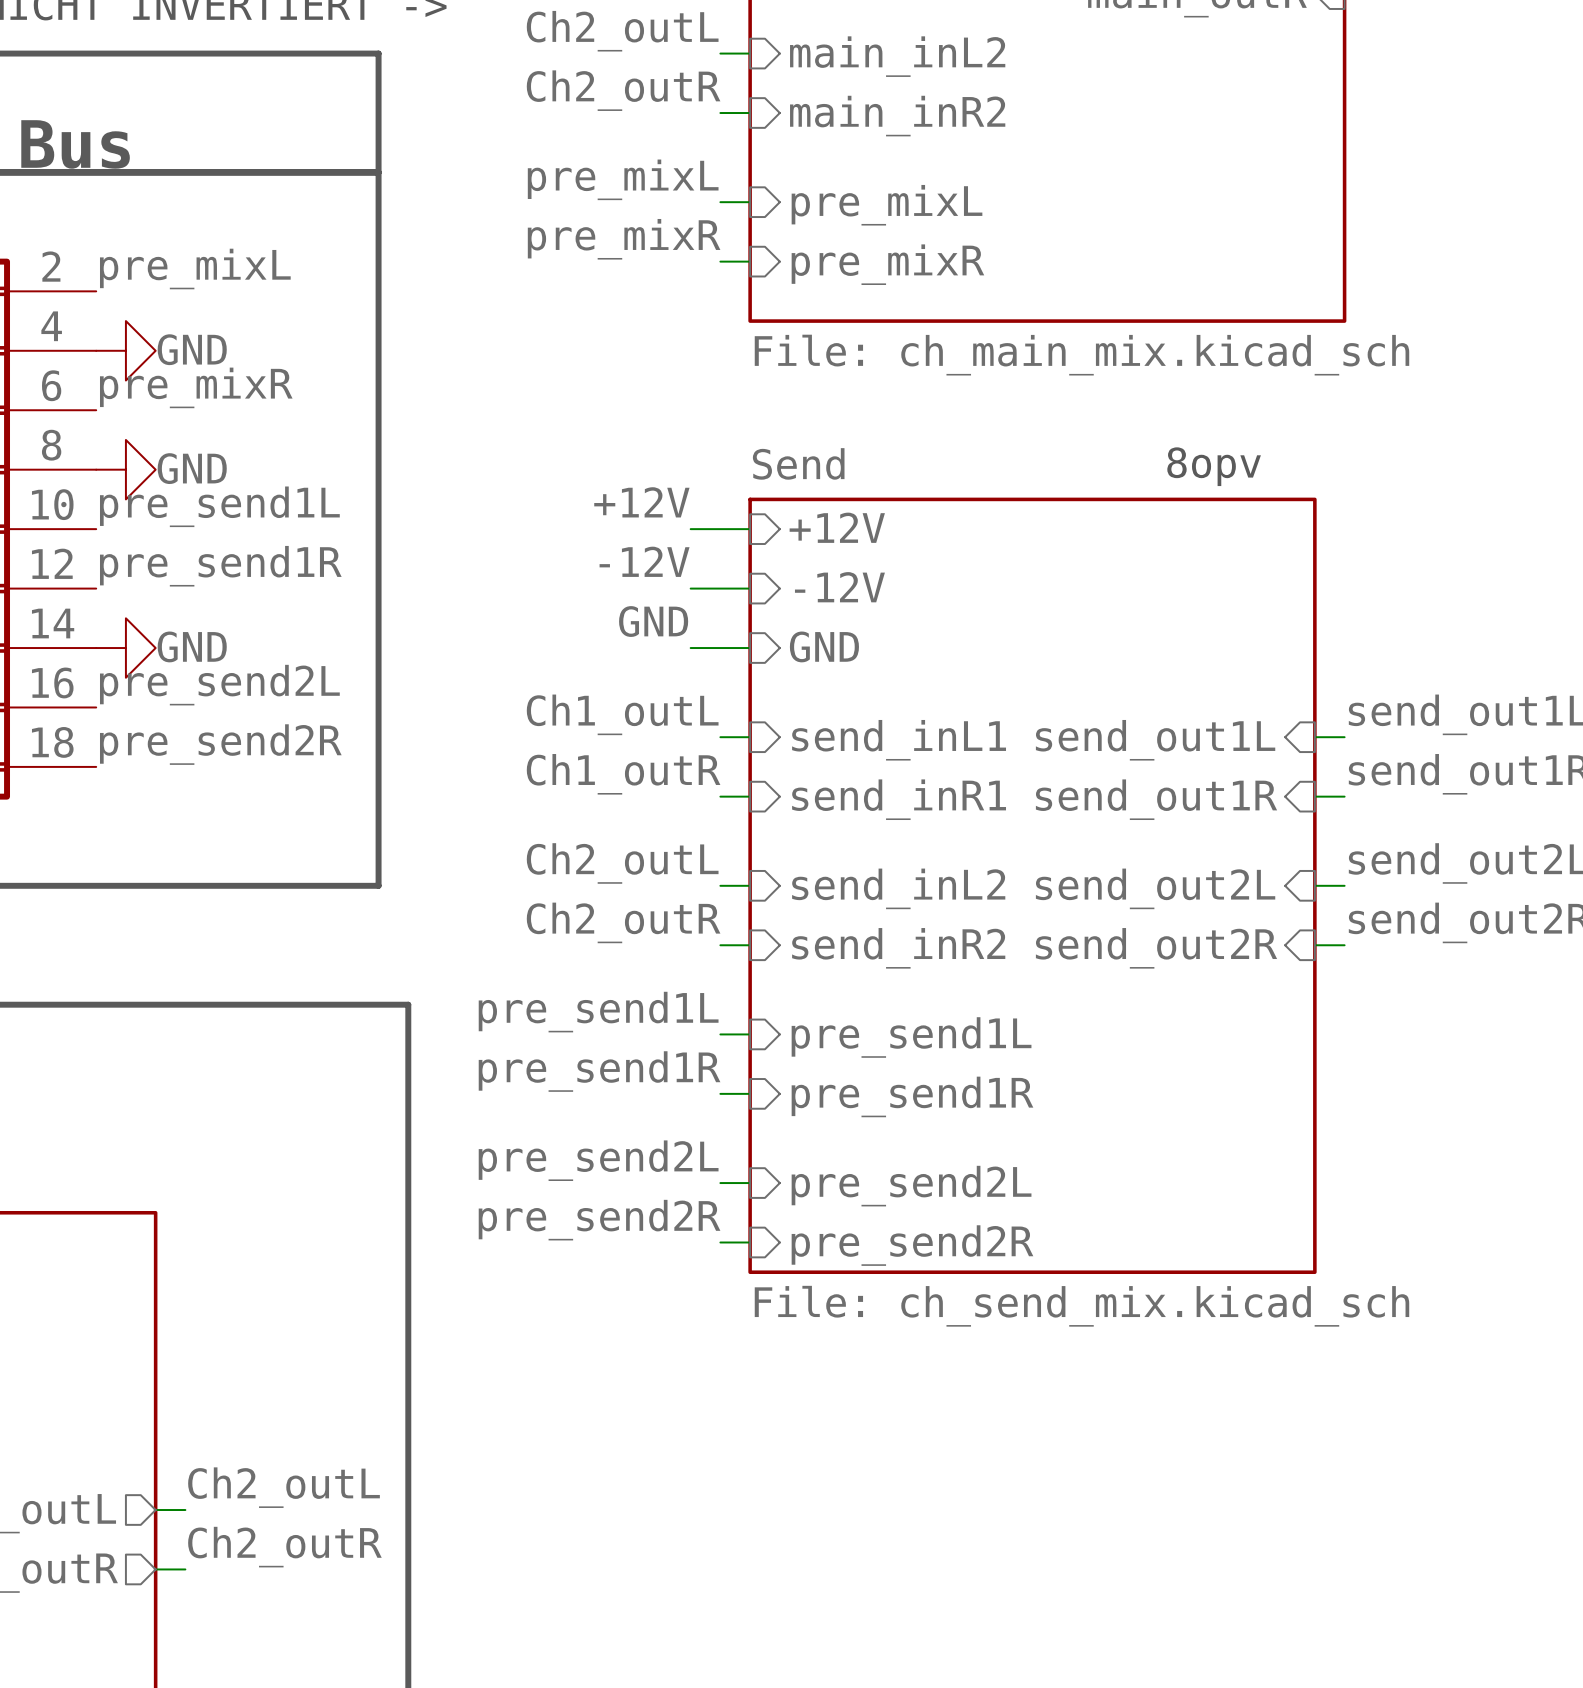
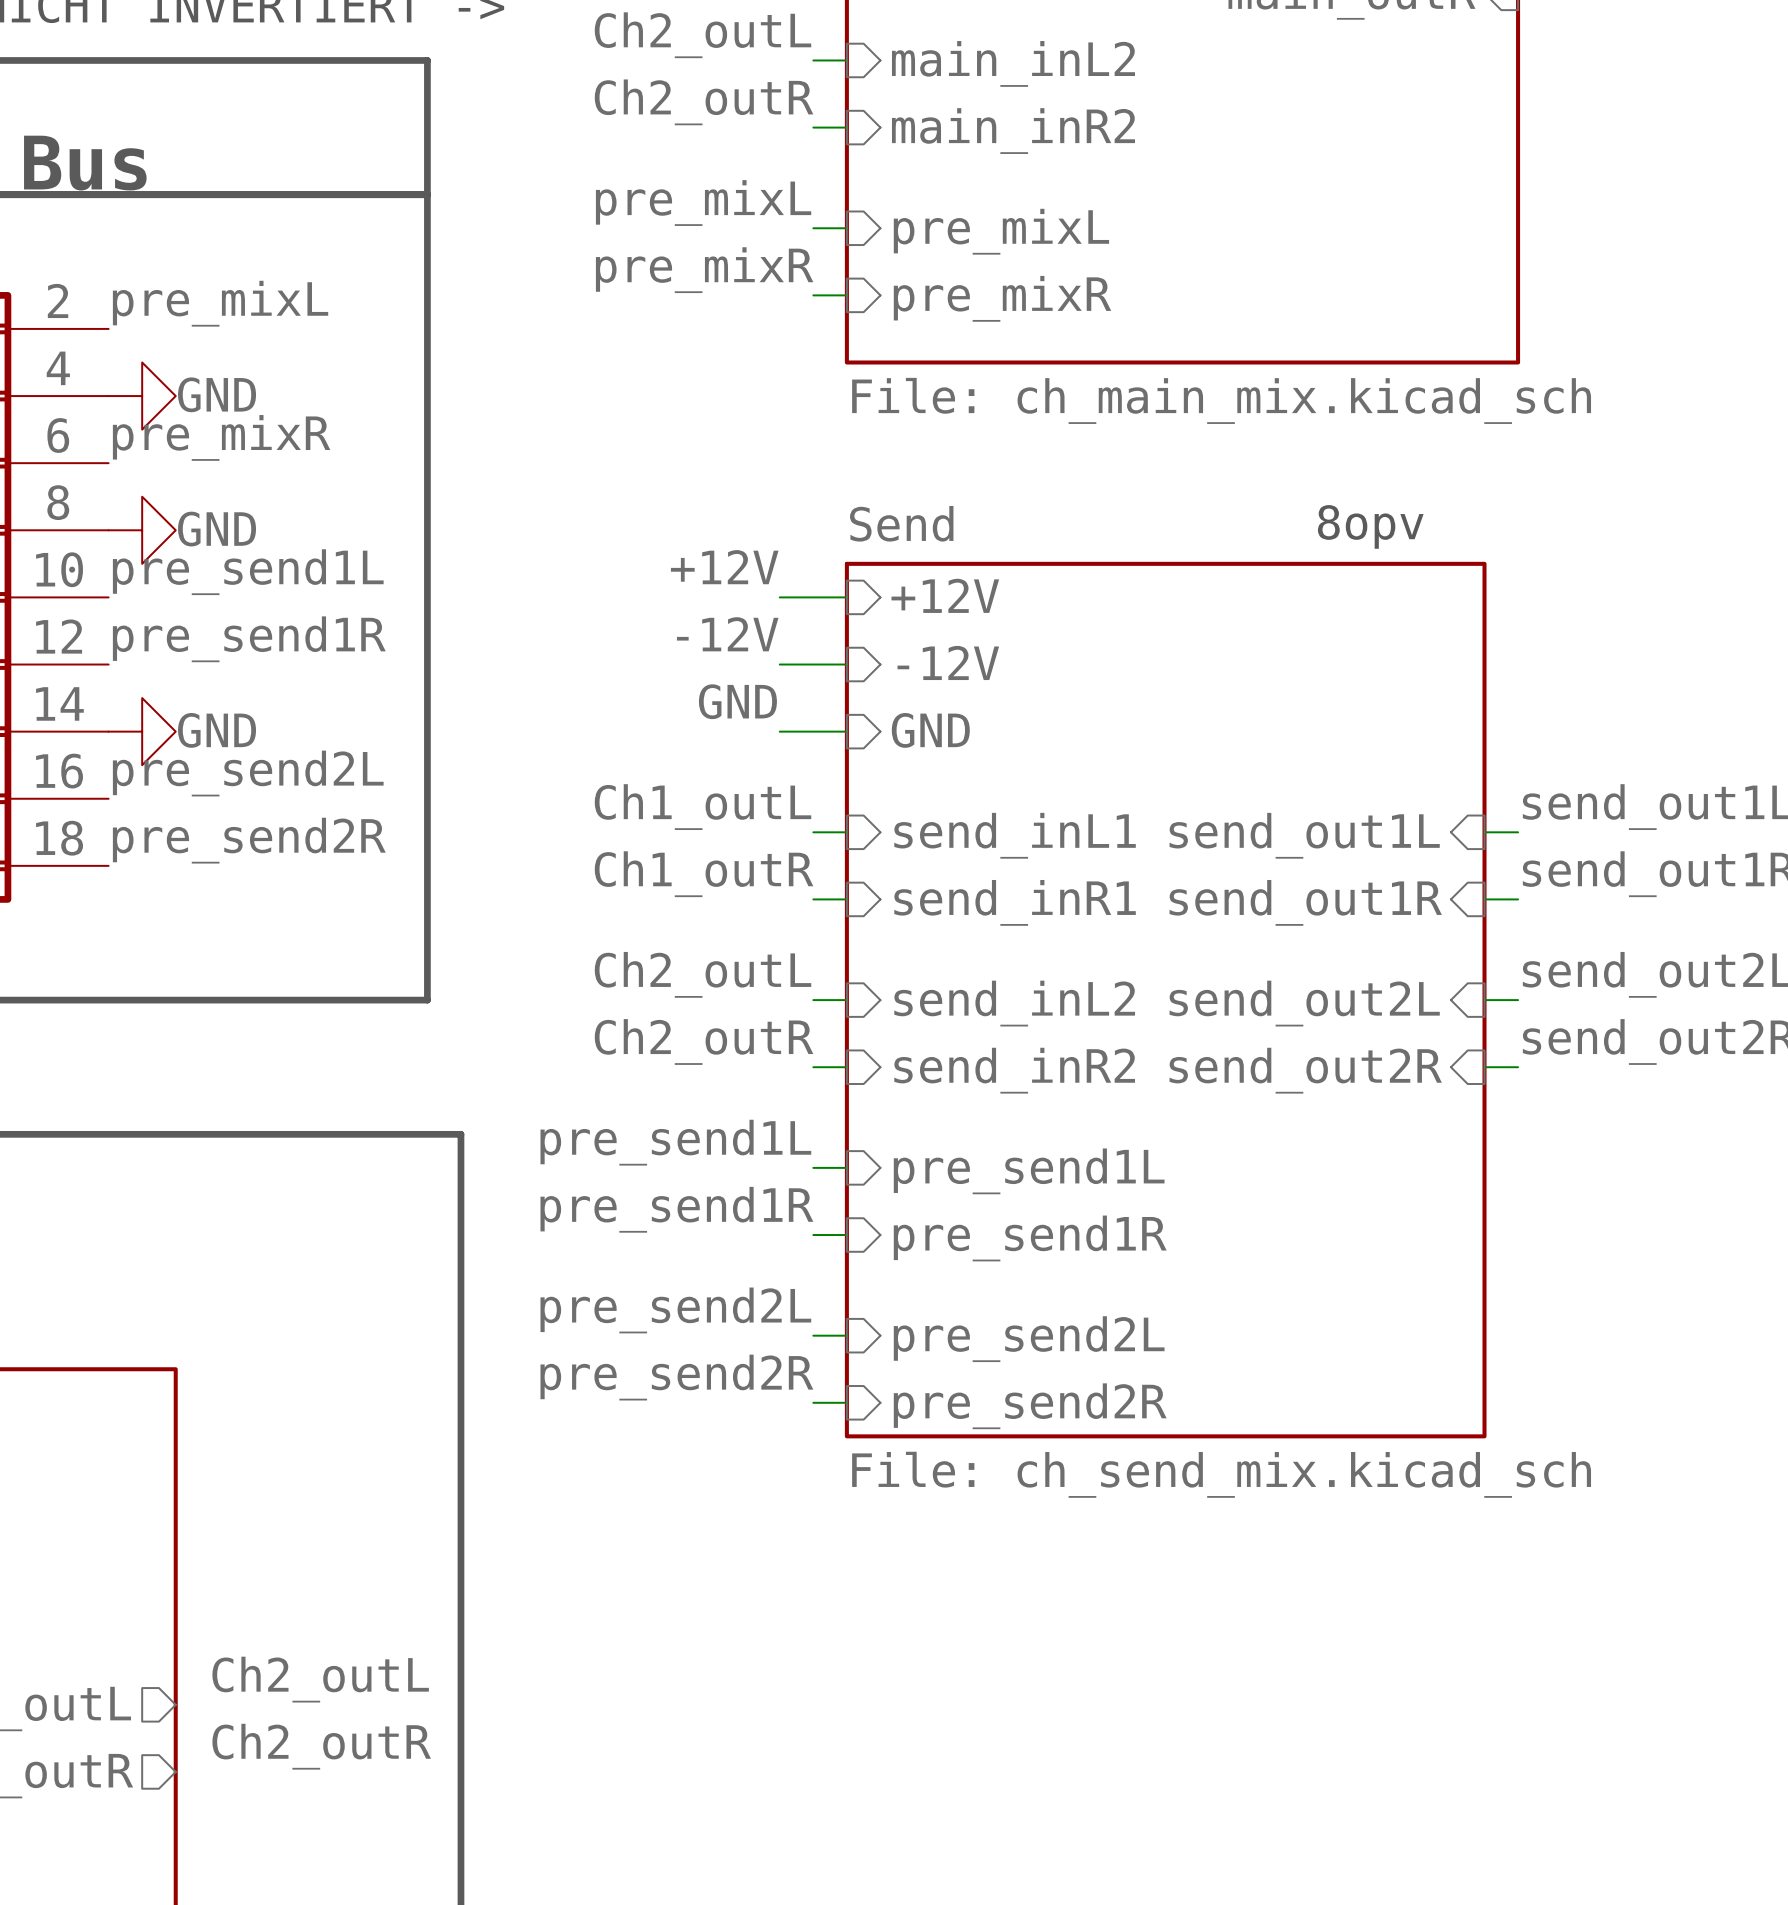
wire: (155, 1510) (185, 1510) -> none
wire: (155, 1569) (185, 1569) -> none

